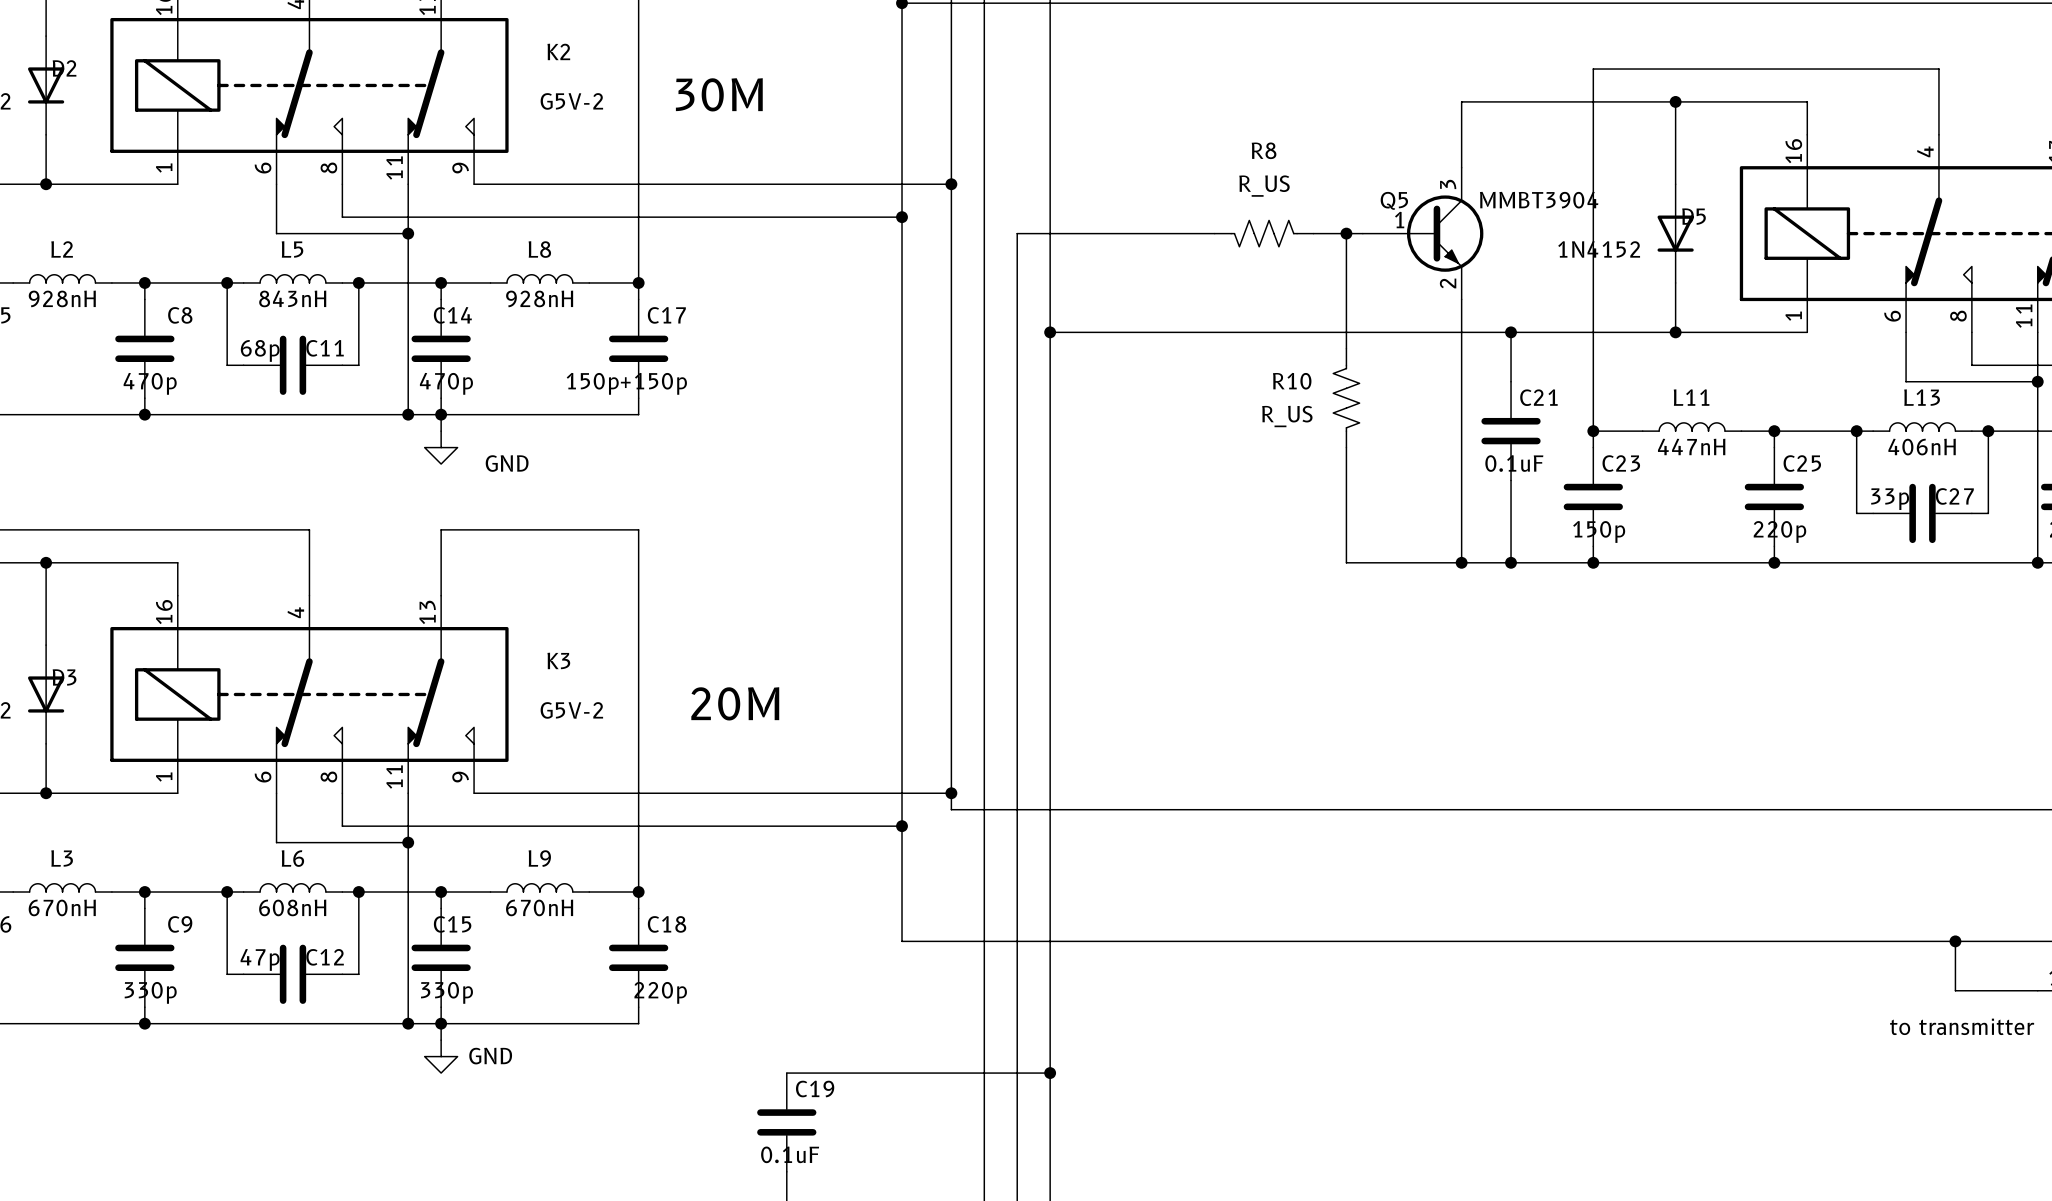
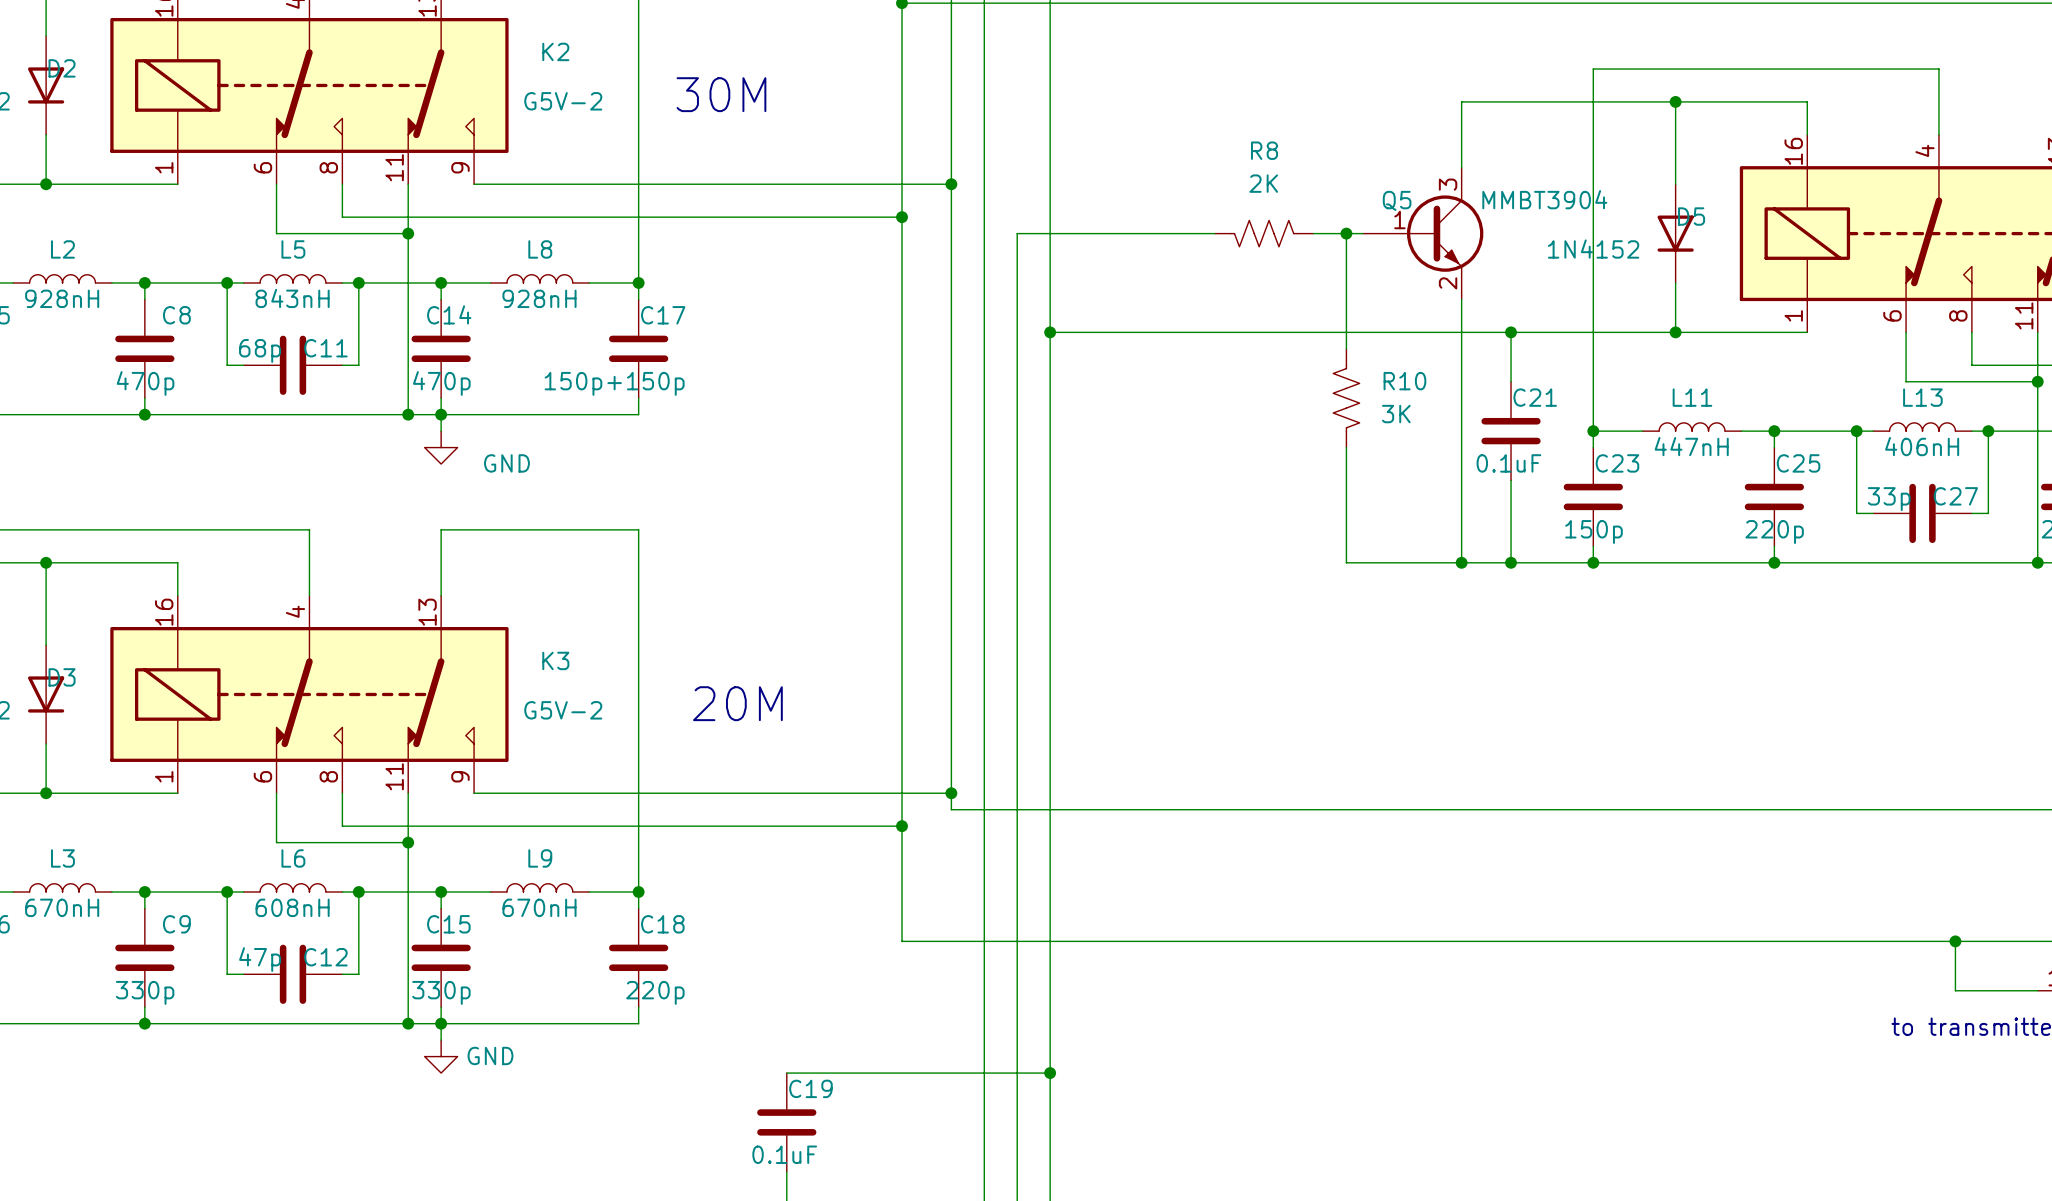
R8 value: R_US (1264, 186) -> 2K (1263, 183)
R10 name position: R10 (1292, 381) -> R10 (1404, 381)
R10 value: R_US (1287, 416) -> 3K (1396, 414)

